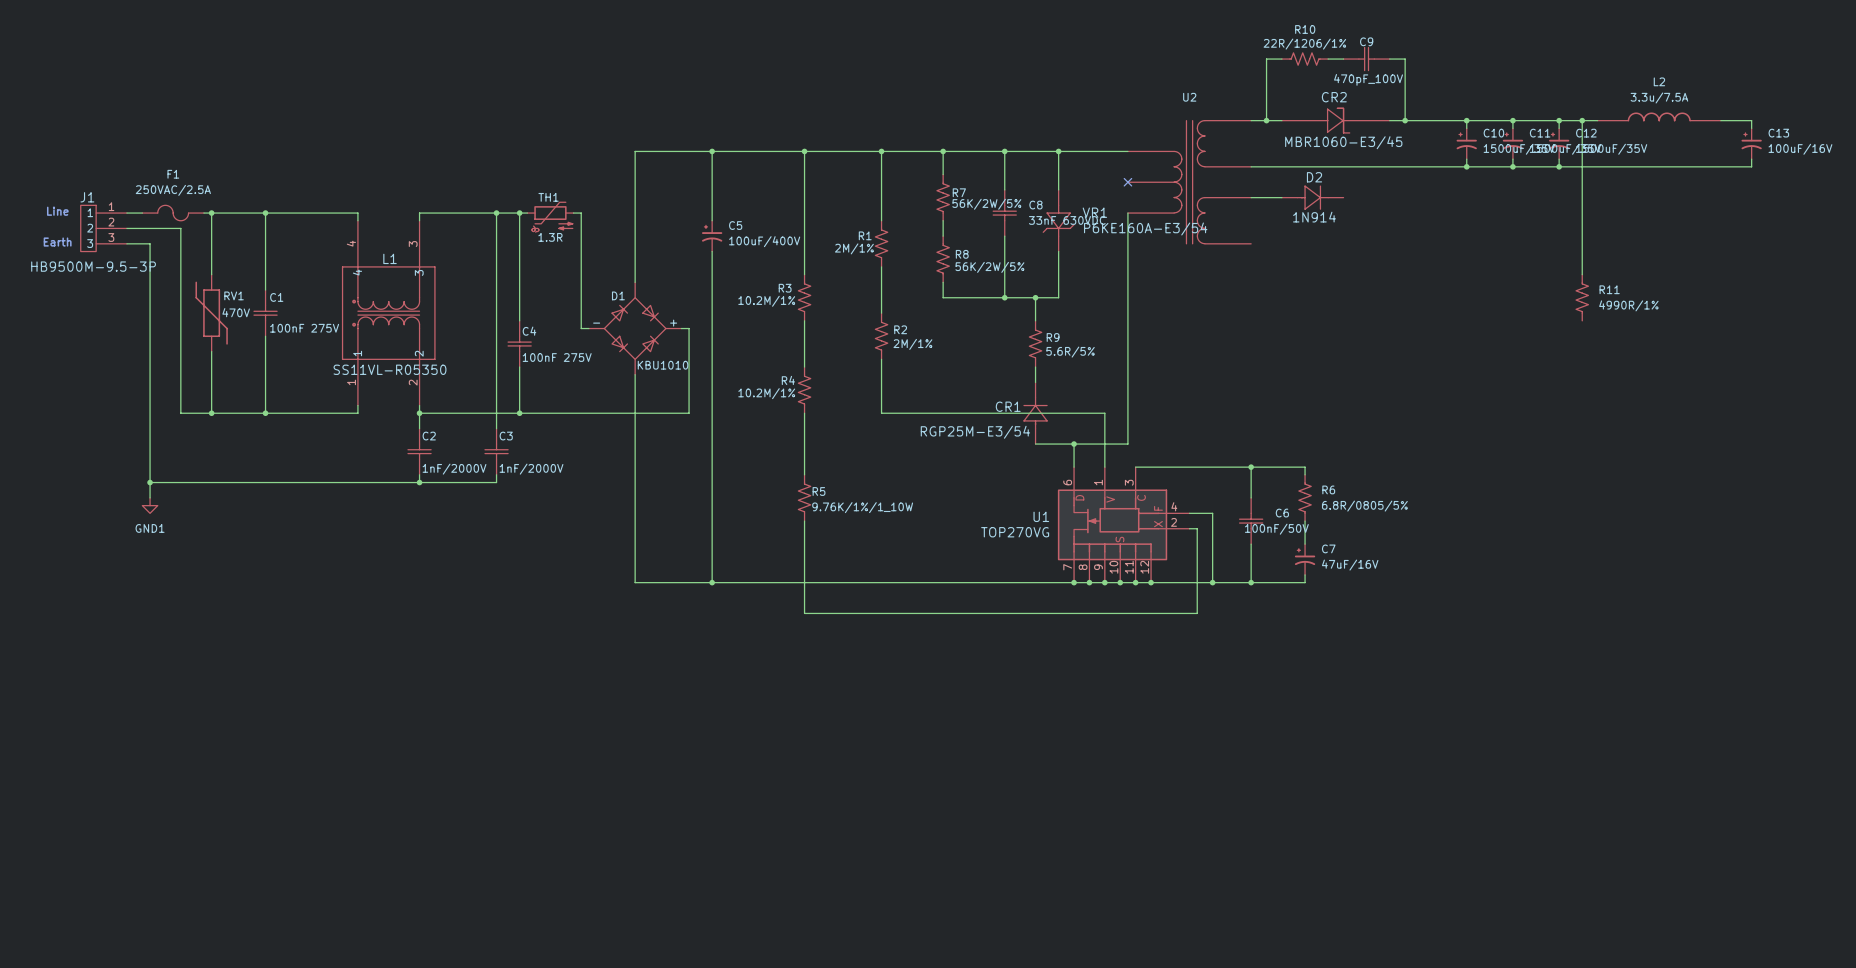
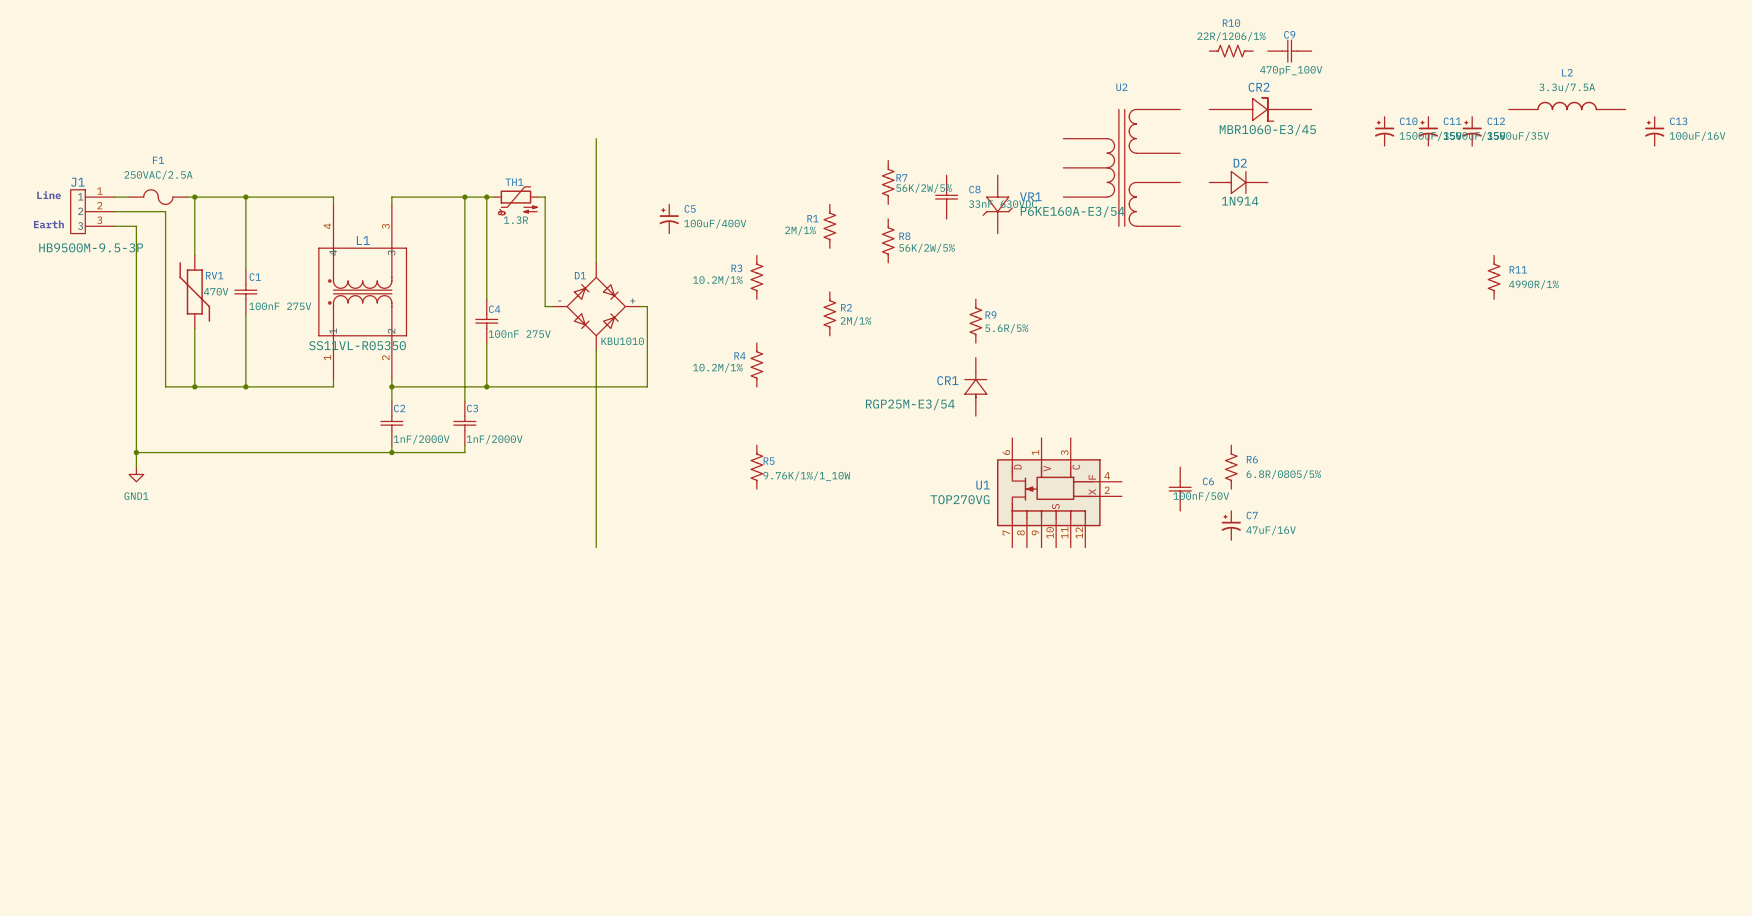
wire: (1281, 59) (1266, 59) (1266, 120) -> none
wire: (1328, 59) (1343, 59) -> none
wire: (1389, 59) (1405, 59) (1405, 120) -> none
wire: (1251, 120) (1281, 120) -> none
junction: (1266, 120) -> none
wire: (1389, 120) (1597, 120) -> none
junction: (1405, 120) -> none
wire: (1466, 120) (1466, 128) -> none
junction: (1466, 120) -> none
wire: (1512, 120) (1512, 128) -> none
junction: (1512, 120) -> none
wire: (1559, 120) (1559, 128) -> none
junction: (1559, 120) -> none
wire: (1582, 120) (1582, 274) -> none
junction: (1582, 120) -> none
wire: (1720, 120) (1751, 120) (1751, 128) -> none
wire: (635, 151) (1127, 151) -> none
wire: (712, 151) (712, 220) -> none
junction: (712, 151) -> none
wire: (804, 151) (804, 274) -> none
junction: (804, 151) -> none
wire: (881, 151) (881, 220) -> none
junction: (881, 151) -> none
wire: (943, 151) (943, 174) -> none
junction: (943, 151) -> none
wire: (1004, 151) (1004, 189) -> none
junction: (1004, 151) -> none
wire: (1058, 151) (1058, 189) -> none
junction: (1058, 151) -> none
wire: (1466, 159) (1466, 166) -> none
wire: (1512, 159) (1512, 166) -> none
wire: (1559, 159) (1559, 166) -> none
wire: (1751, 159) (1751, 166) (1251, 166) -> none
junction: (1466, 166) -> none
junction: (1512, 166) -> none
junction: (1559, 166) -> none
no-connect mark: (1127, 182) -> none
wire: (1251, 197) (1281, 197) -> none
wire: (1127, 213) (1127, 444) (1035, 444) -> none
wire: (943, 220) (943, 236) -> none
wire: (1004, 236) (1004, 297) -> none
wire: (712, 251) (712, 582) -> none
wire: (1058, 251) (1058, 297) (943, 297) (943, 282) -> none
wire: (881, 266) (881, 313) -> none
junction: (1004, 297) -> none
wire: (1035, 297) (1035, 320) -> none
junction: (1035, 297) -> none
wire: (804, 320) (804, 367) -> none
wire: (881, 359) (881, 413) (1104, 413) (1104, 467) -> none
wire: (1035, 367) (1035, 382) -> none
wire: (804, 413) (804, 474) -> none
wire: (1074, 444) (1074, 467) -> none
junction: (1074, 444) -> none
wire: (1135, 467) (1305, 467) (1305, 474) -> none
wire: (1251, 467) (1251, 497) -> none
junction: (1251, 467) -> none
wire: (1189, 513) (1212, 513) (1212, 582) -> none
wire: (804, 521) (804, 613) (1197, 613) (1197, 528) (1189, 528) -> none
wire: (1305, 521) (1305, 544) -> none
wire: (1251, 544) (1251, 582) -> none
wire: (1305, 574) (1305, 582) (635, 582) -> none
junction: (712, 582) -> none
junction: (1074, 582) -> none
junction: (1089, 582) -> none
junction: (1104, 582) -> none
junction: (1120, 582) -> none
junction: (1135, 582) -> none
junction: (1151, 582) -> none
junction: (1212, 582) -> none
junction: (1251, 582) -> none

